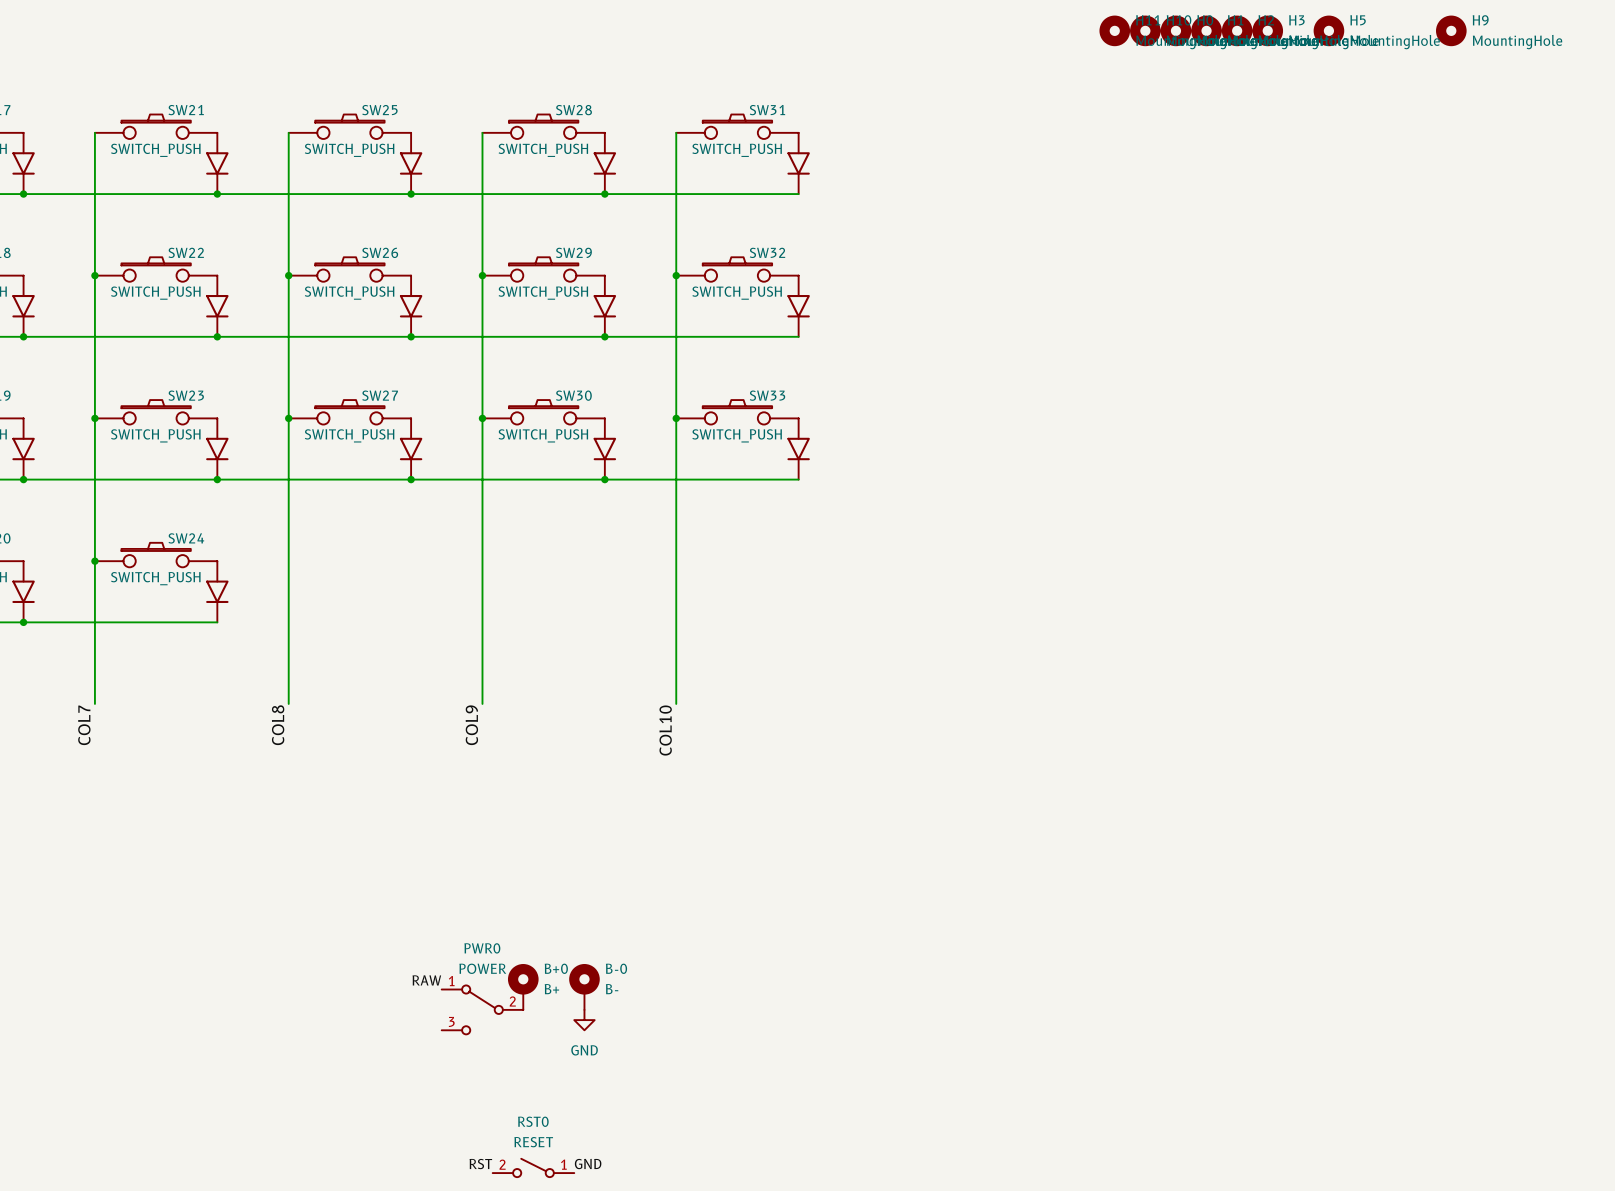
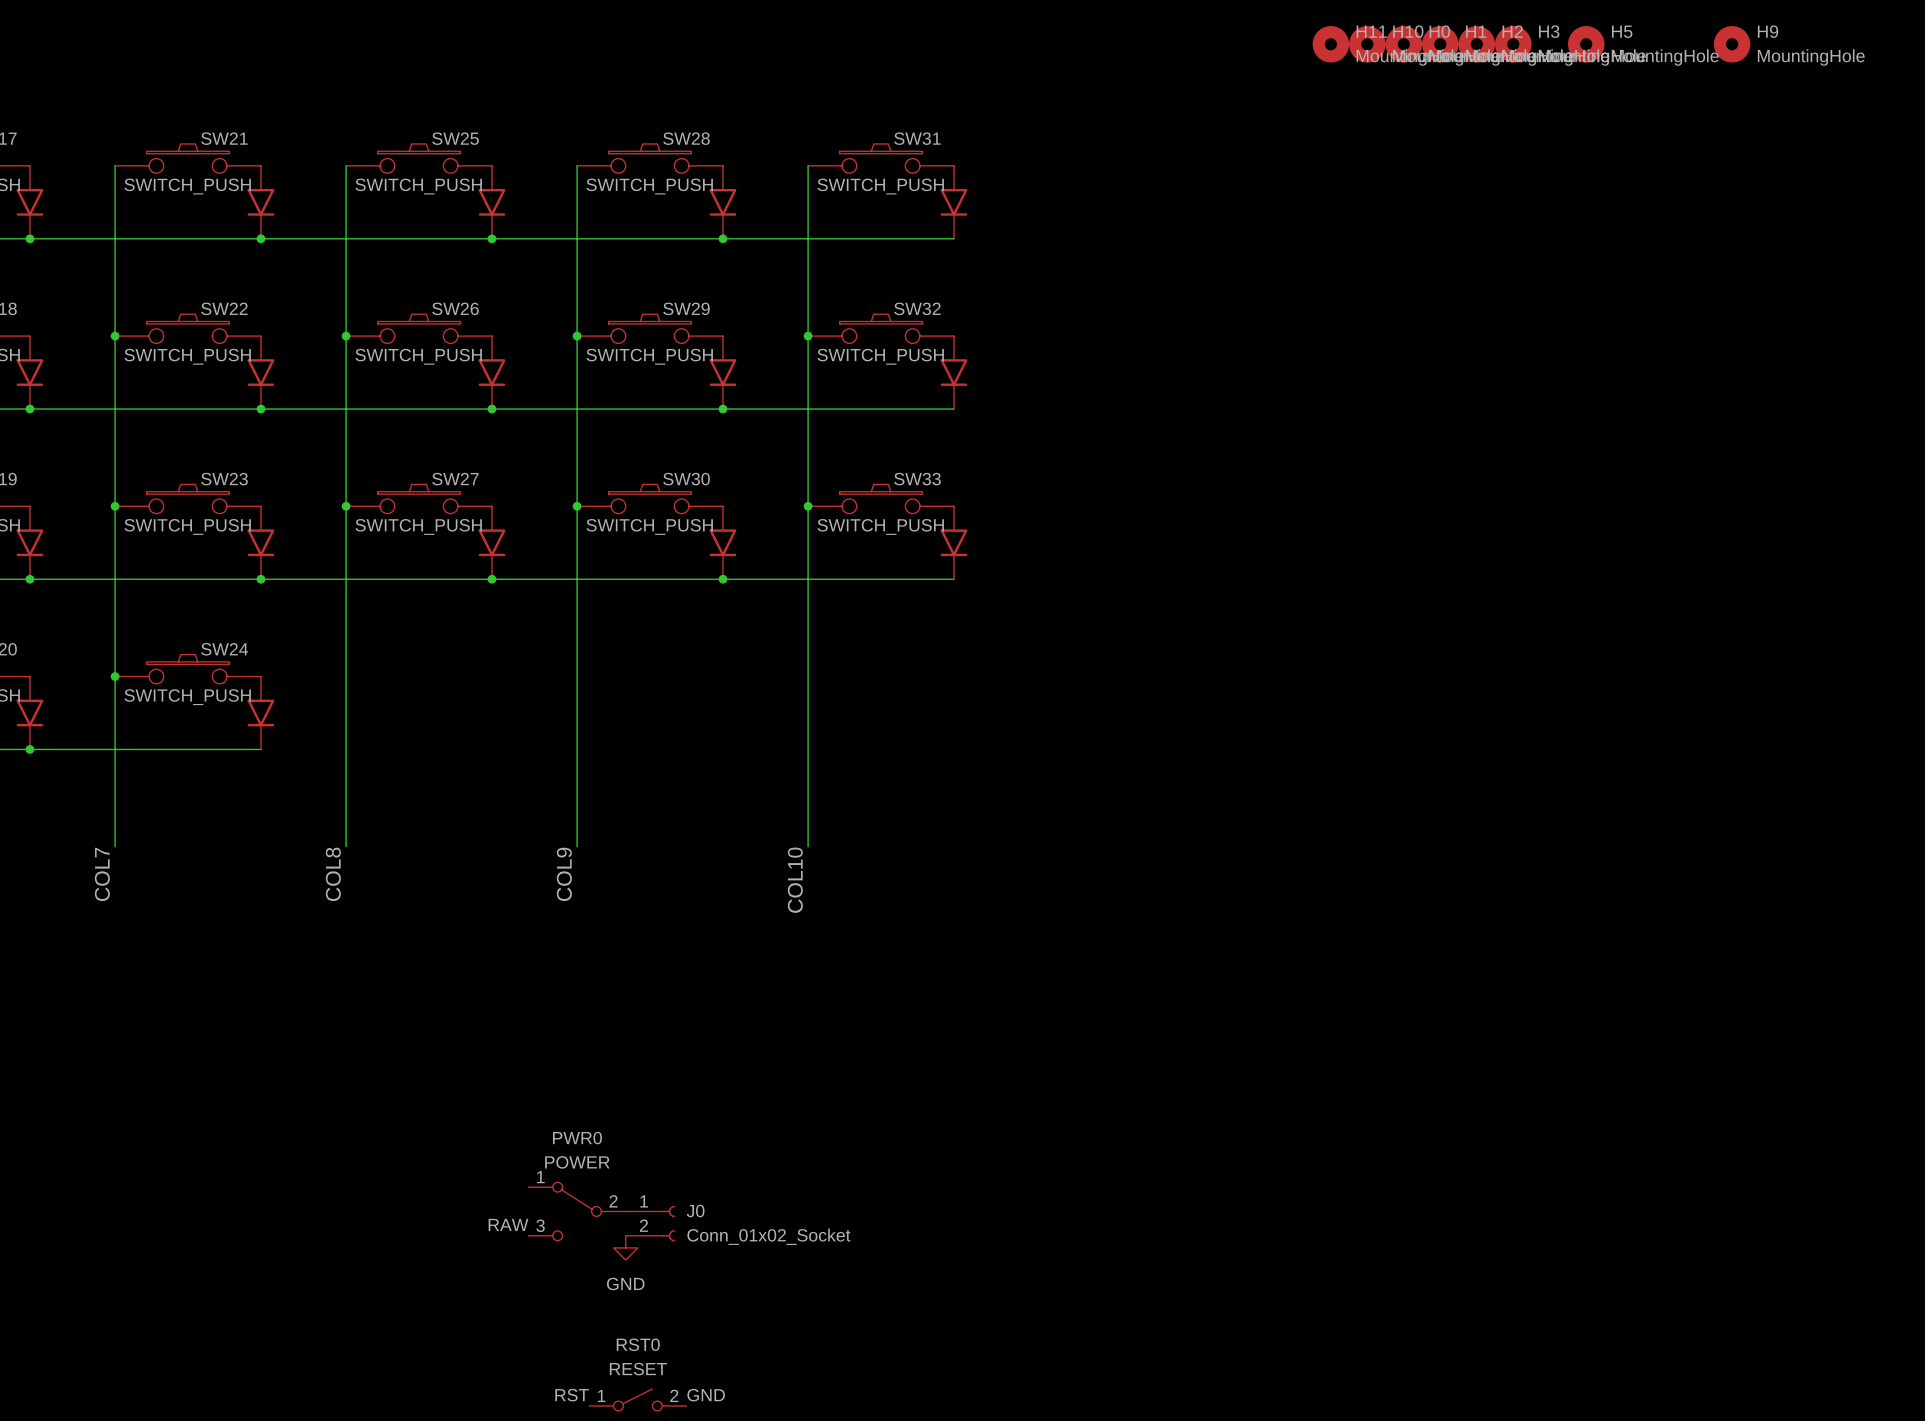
label position: RAW (426, 980) -> RAW (508, 1224)
B+0: B+ (523, 986) -> none
B-0: B- (584, 986) -> none
J0: none -> Conn_01x02_Socket (650, 1223)
power symbol position: GND (584, 1020) -> GND (625, 1247)
RST0 flip: as is (533, 1167) -> left-right (637, 1399)

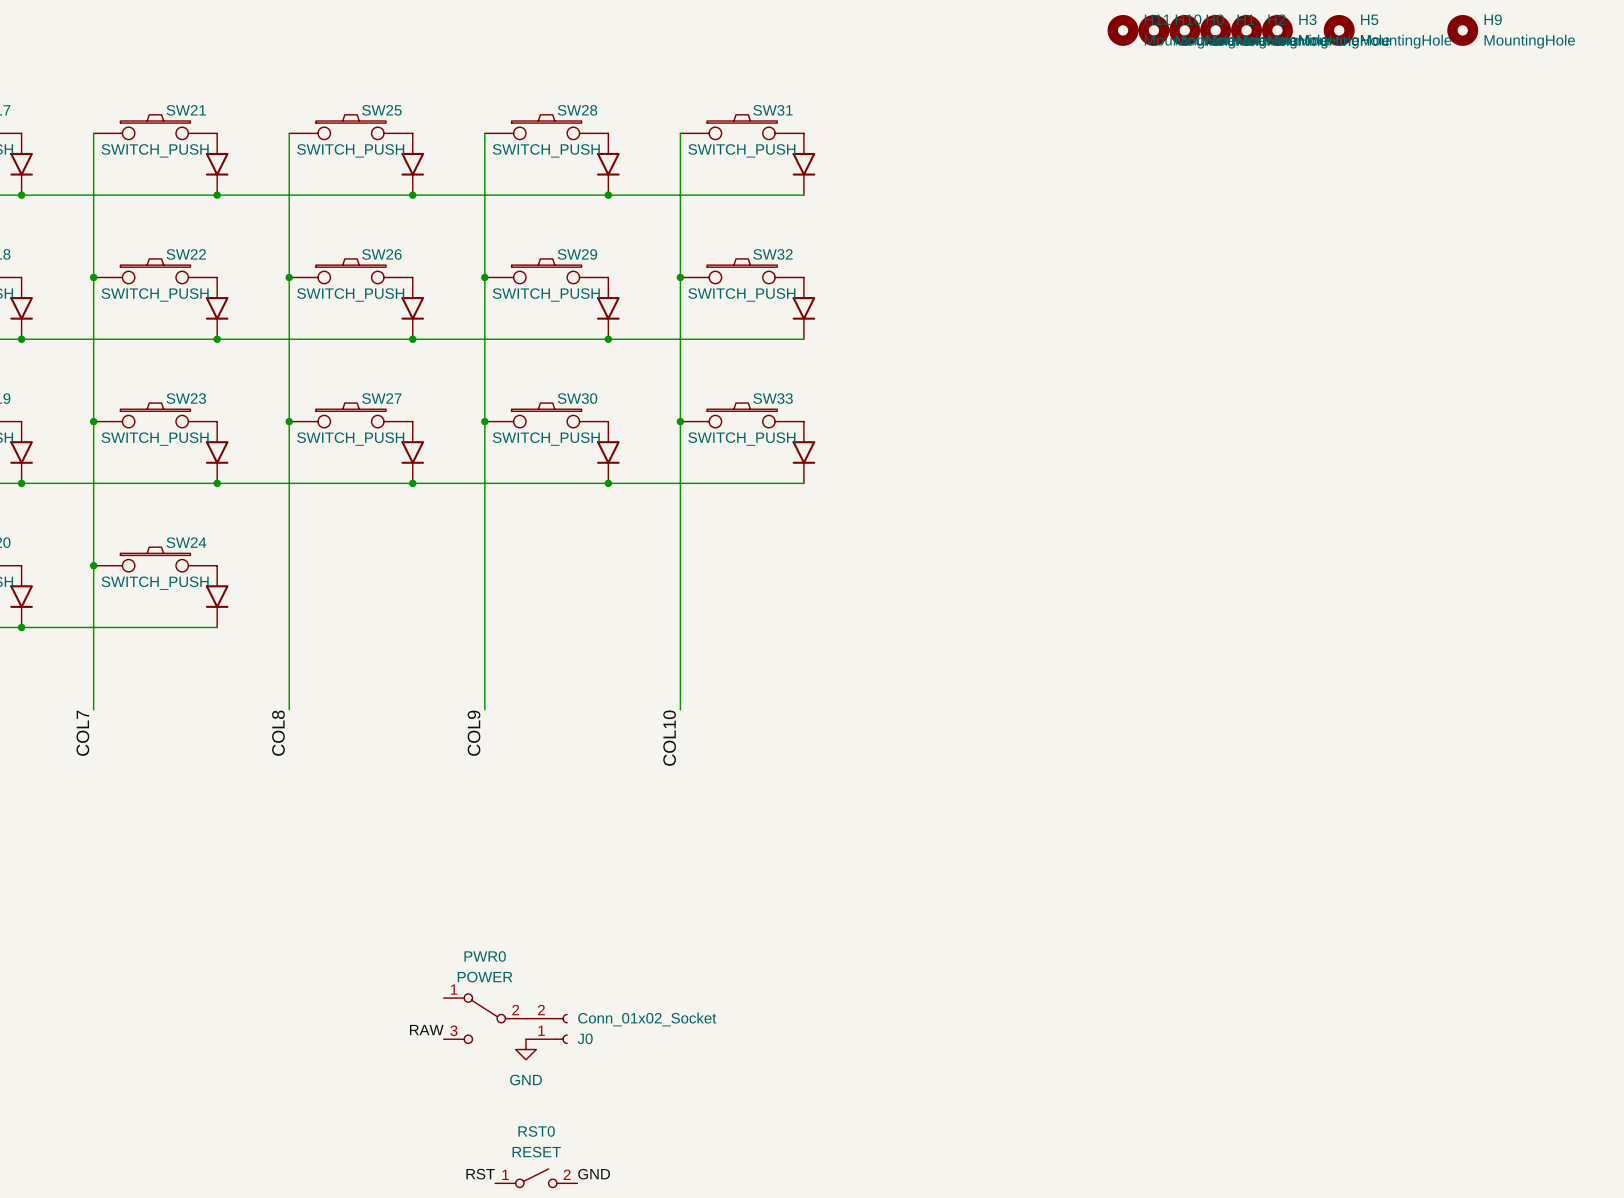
J0 flip: as is (668, 1223) -> up-down (562, 1028)

